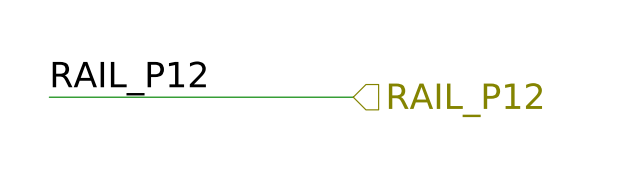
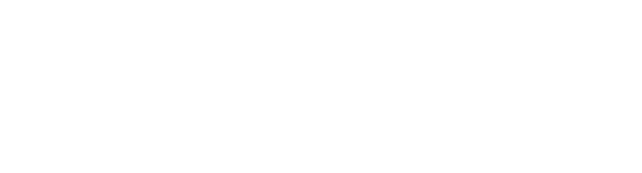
label: RAIL_P12 (129, 78) -> none
wire: (49, 97) (353, 97) -> none
hierarchical label: RAIL_P12 (465, 100) -> none

